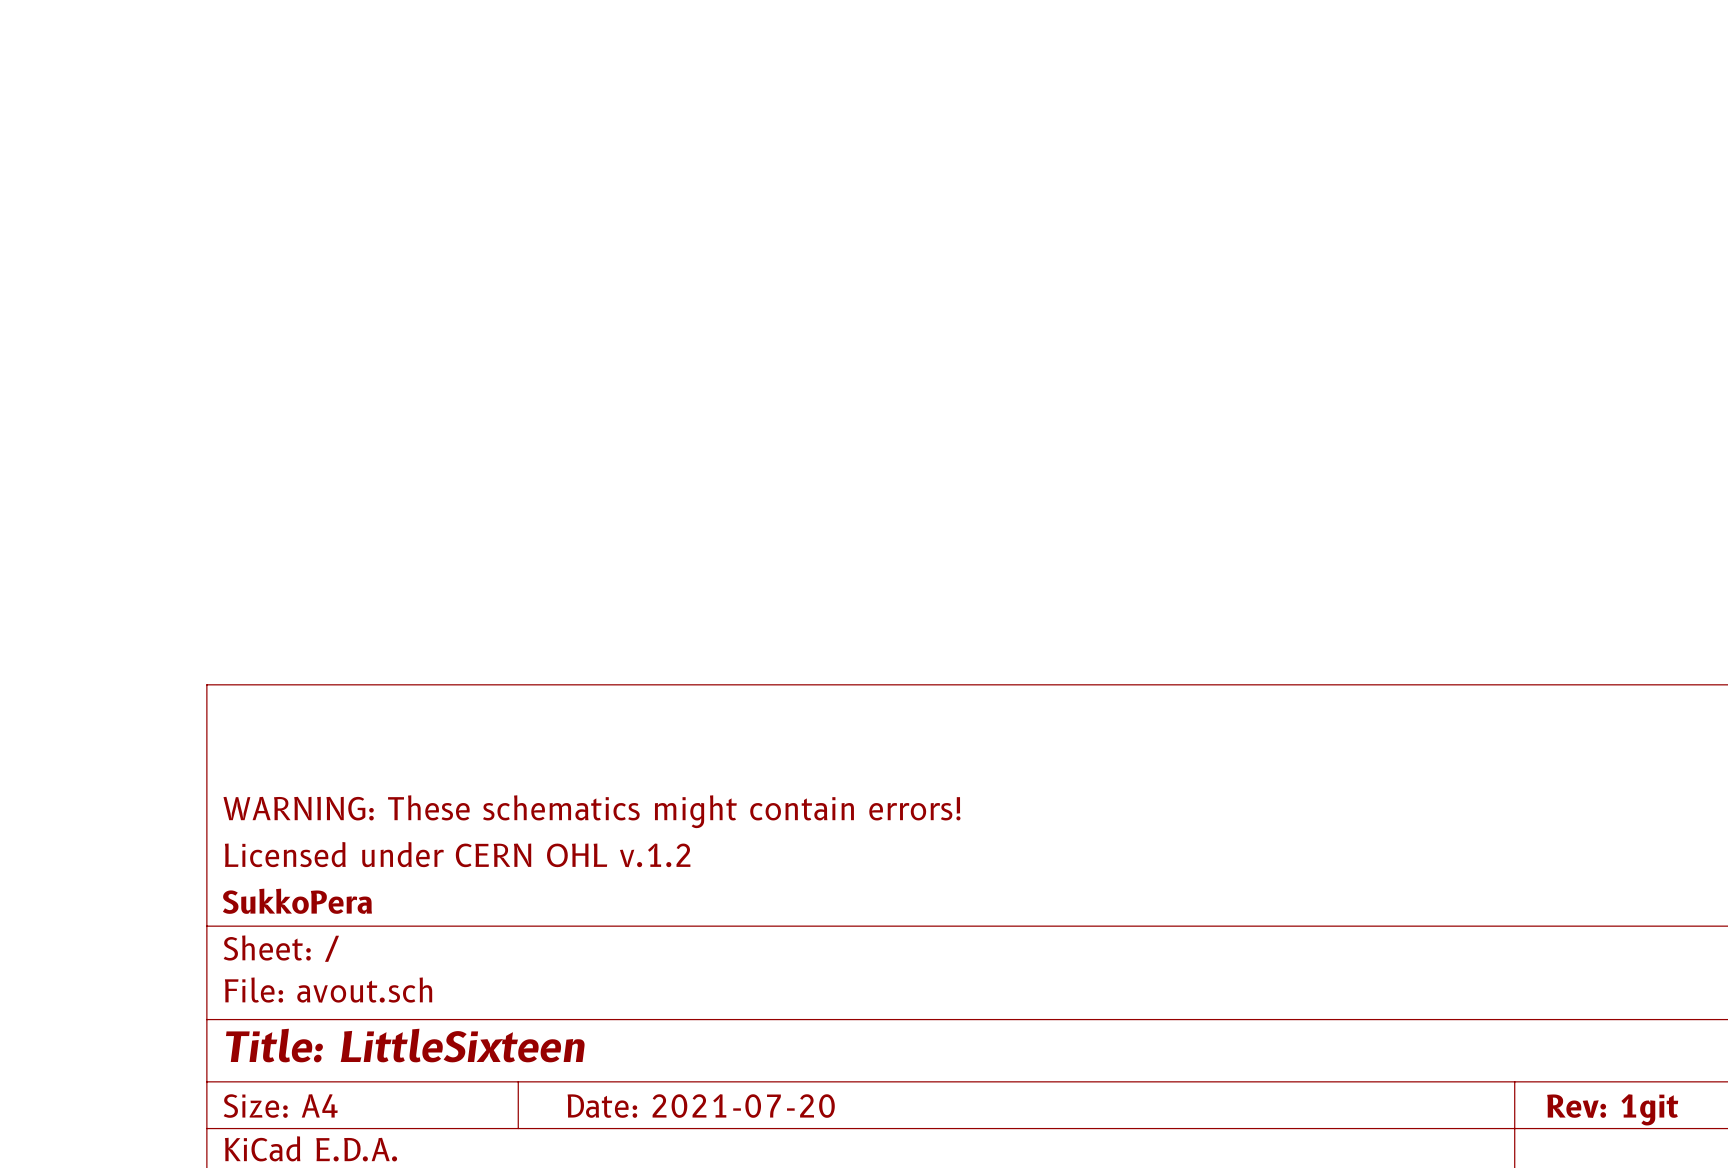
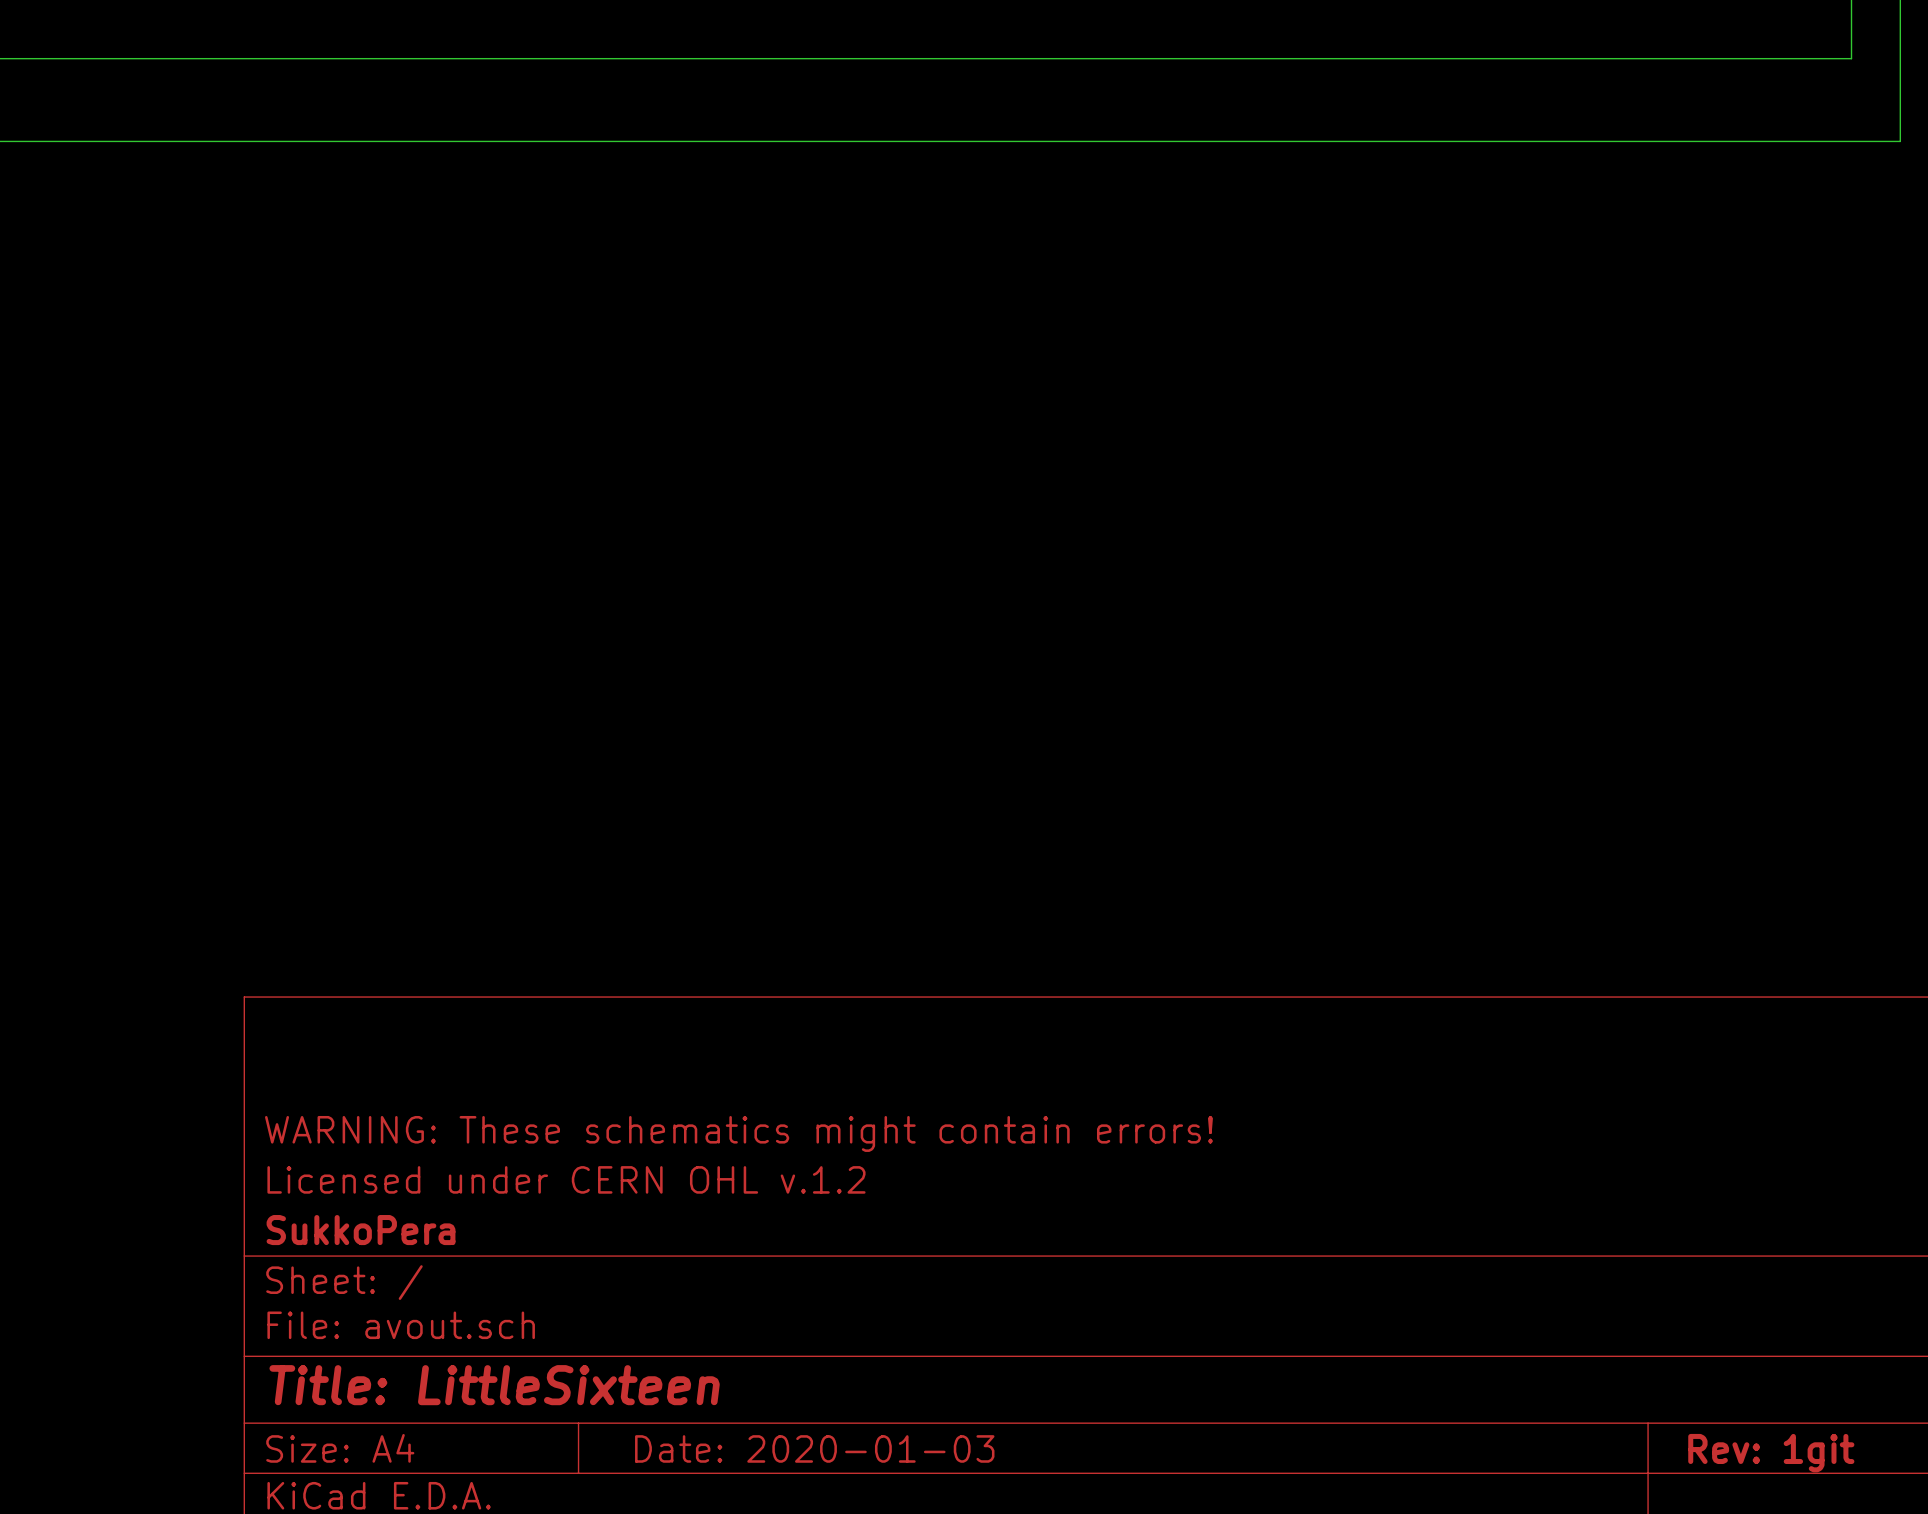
title block: Date: 2021-07-20 (701, 1106) -> Date: 2020-01-03 (814, 1448)

